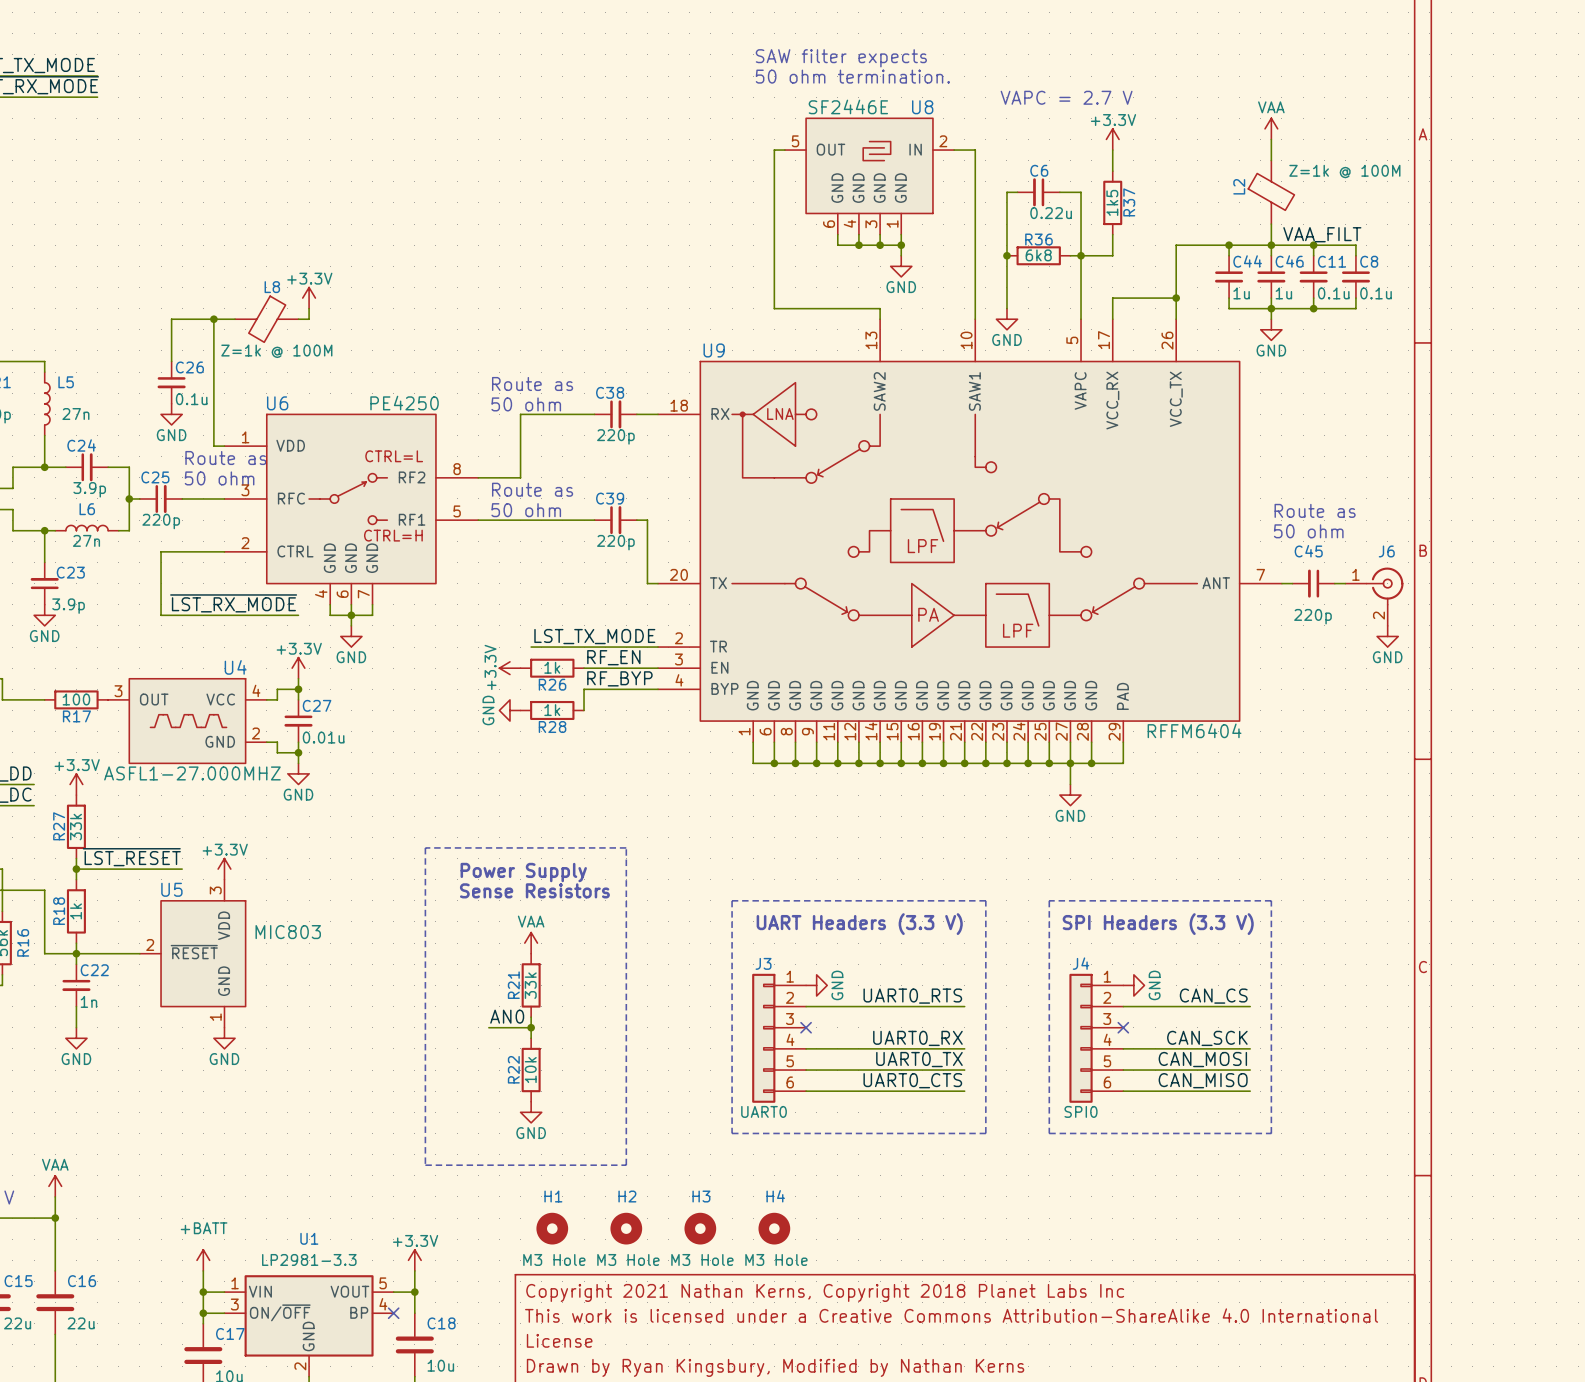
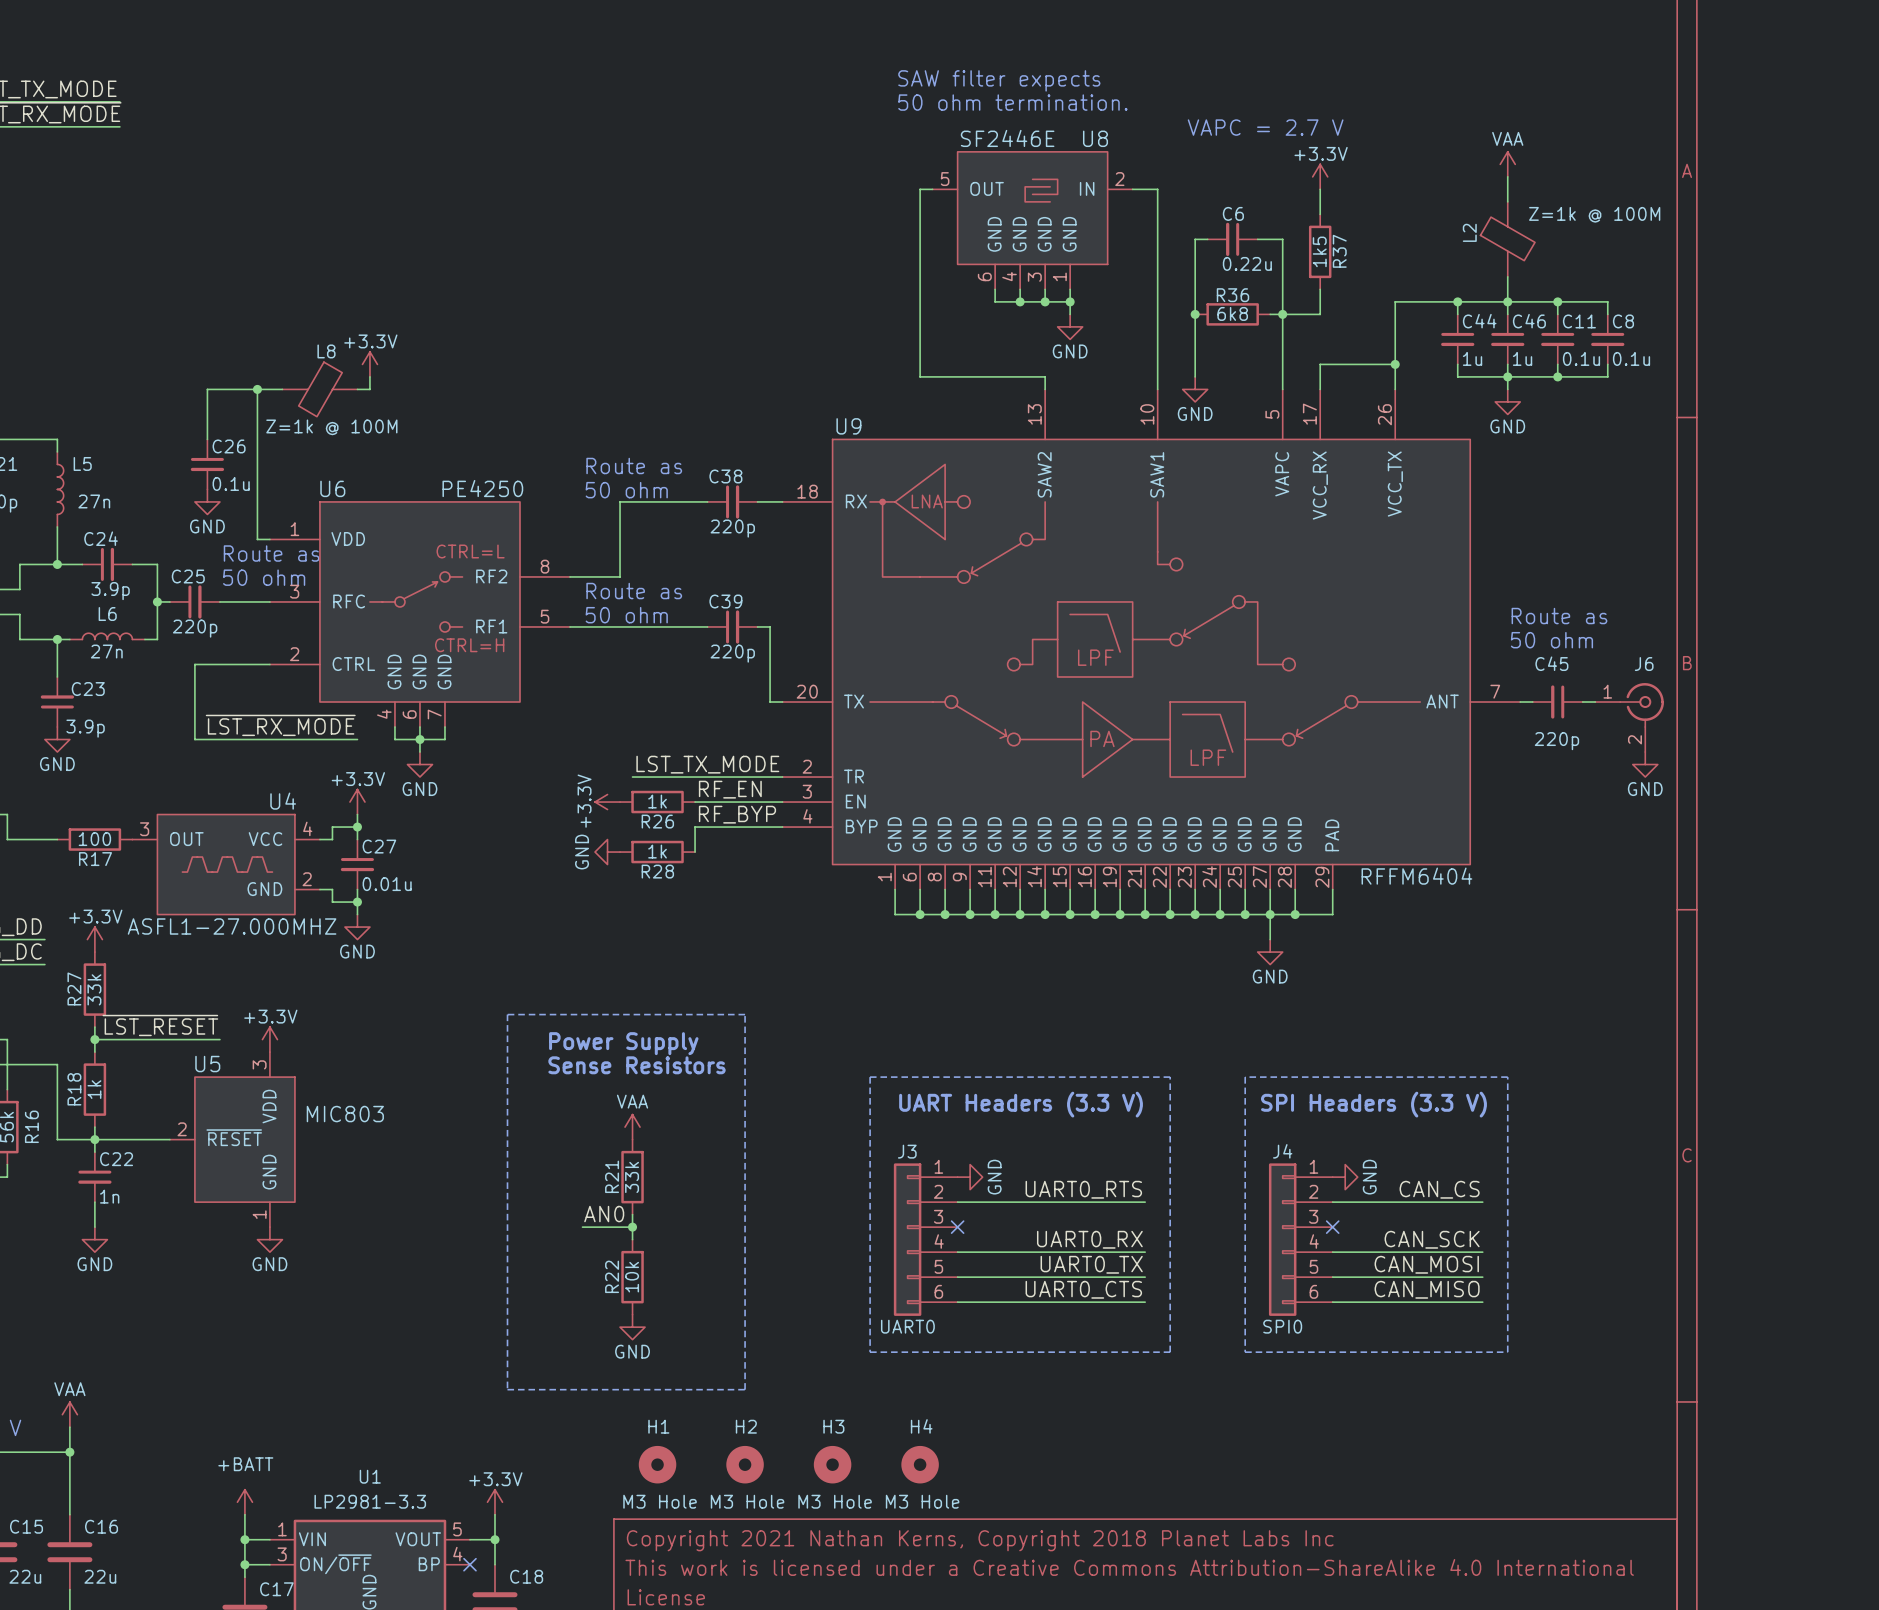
label: VAA_FILT (1322, 234) -> none

